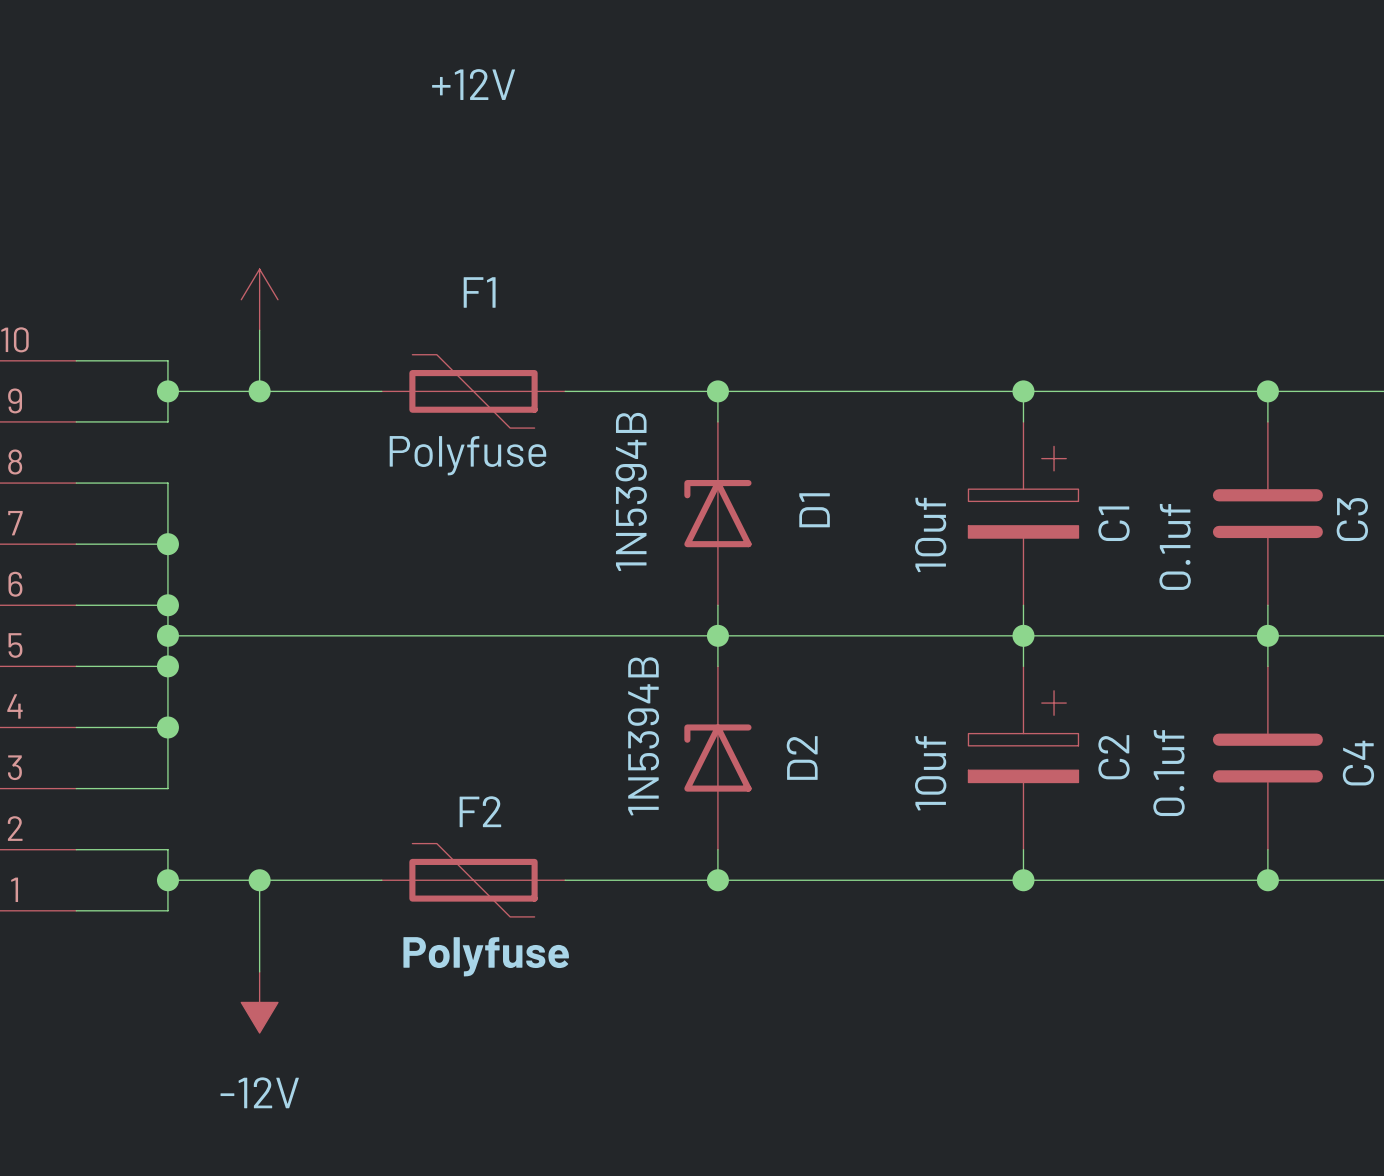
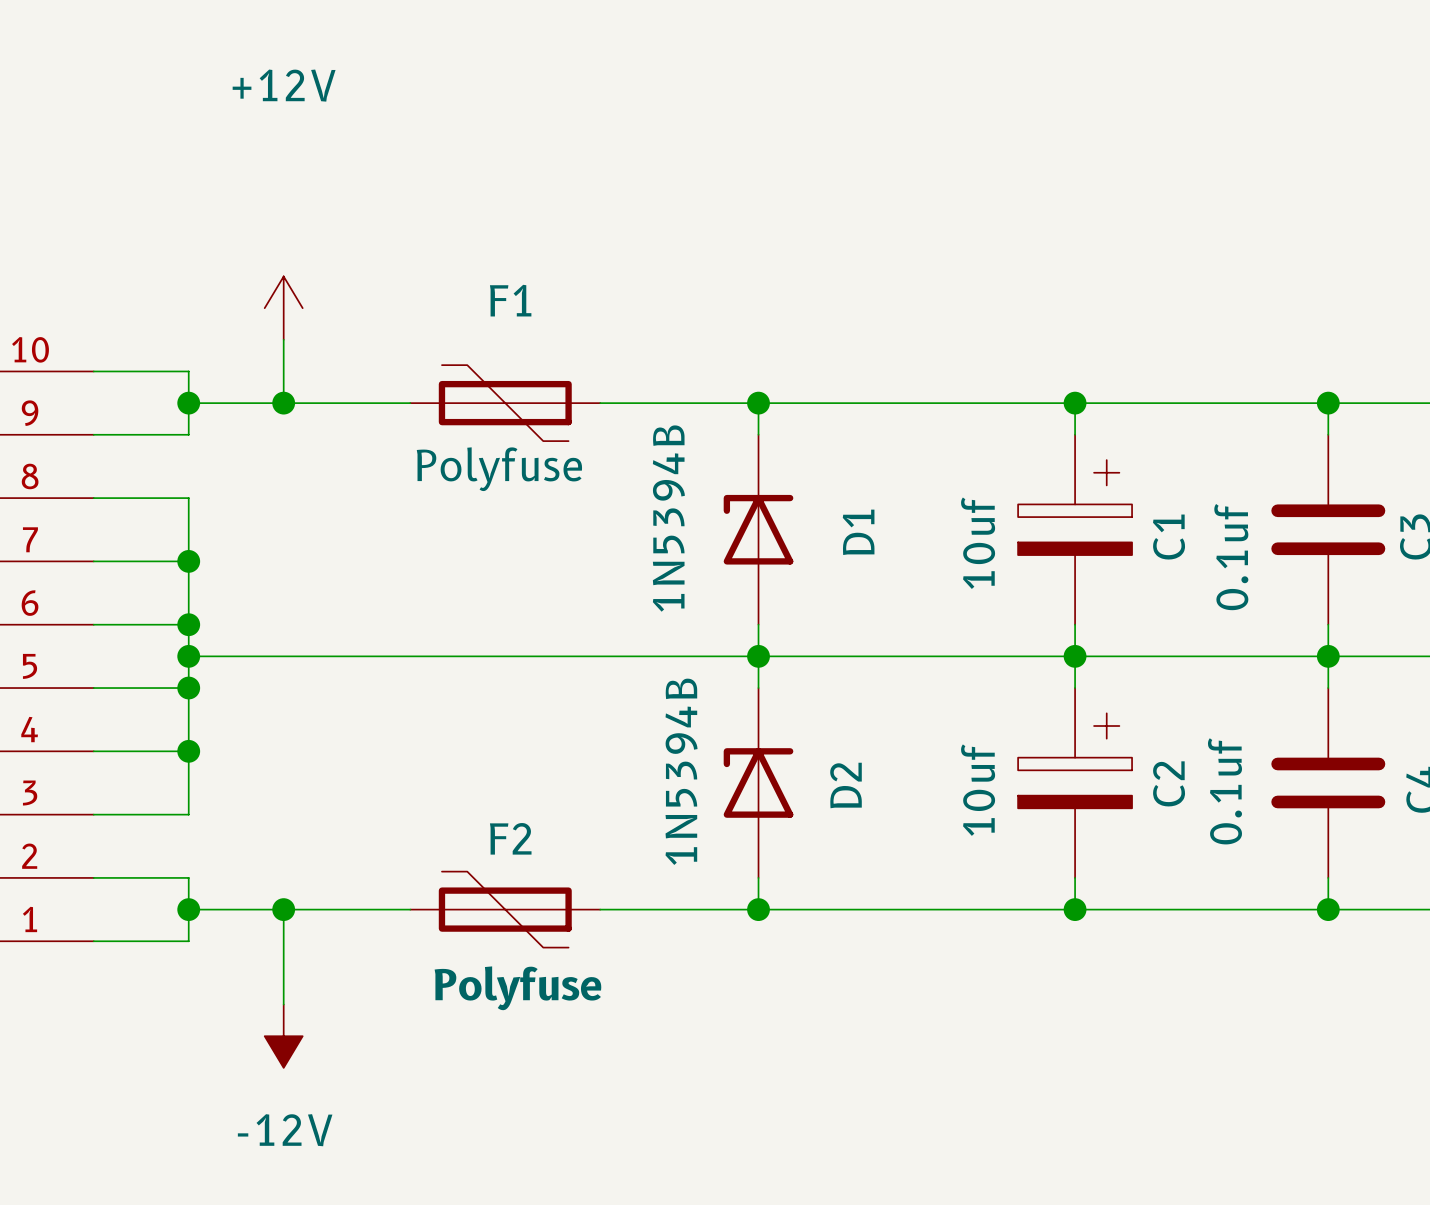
power symbol text position: +12V (473, 84) -> +12V (284, 85)

